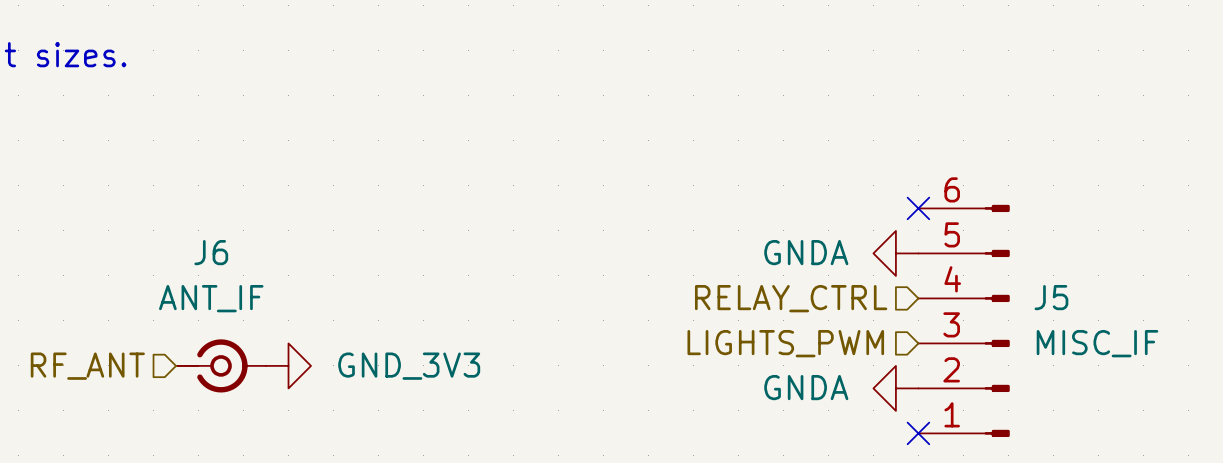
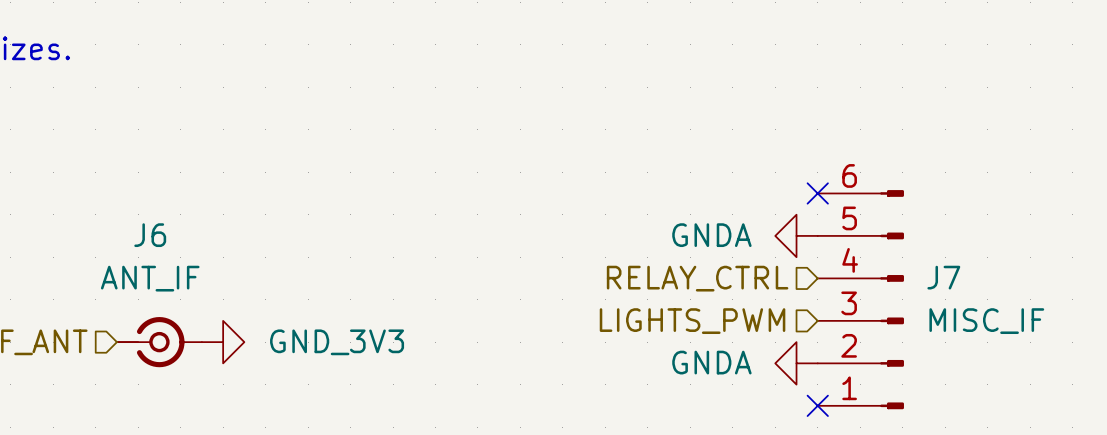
J5 name: J5 (1051, 297) -> J7 (943, 277)

